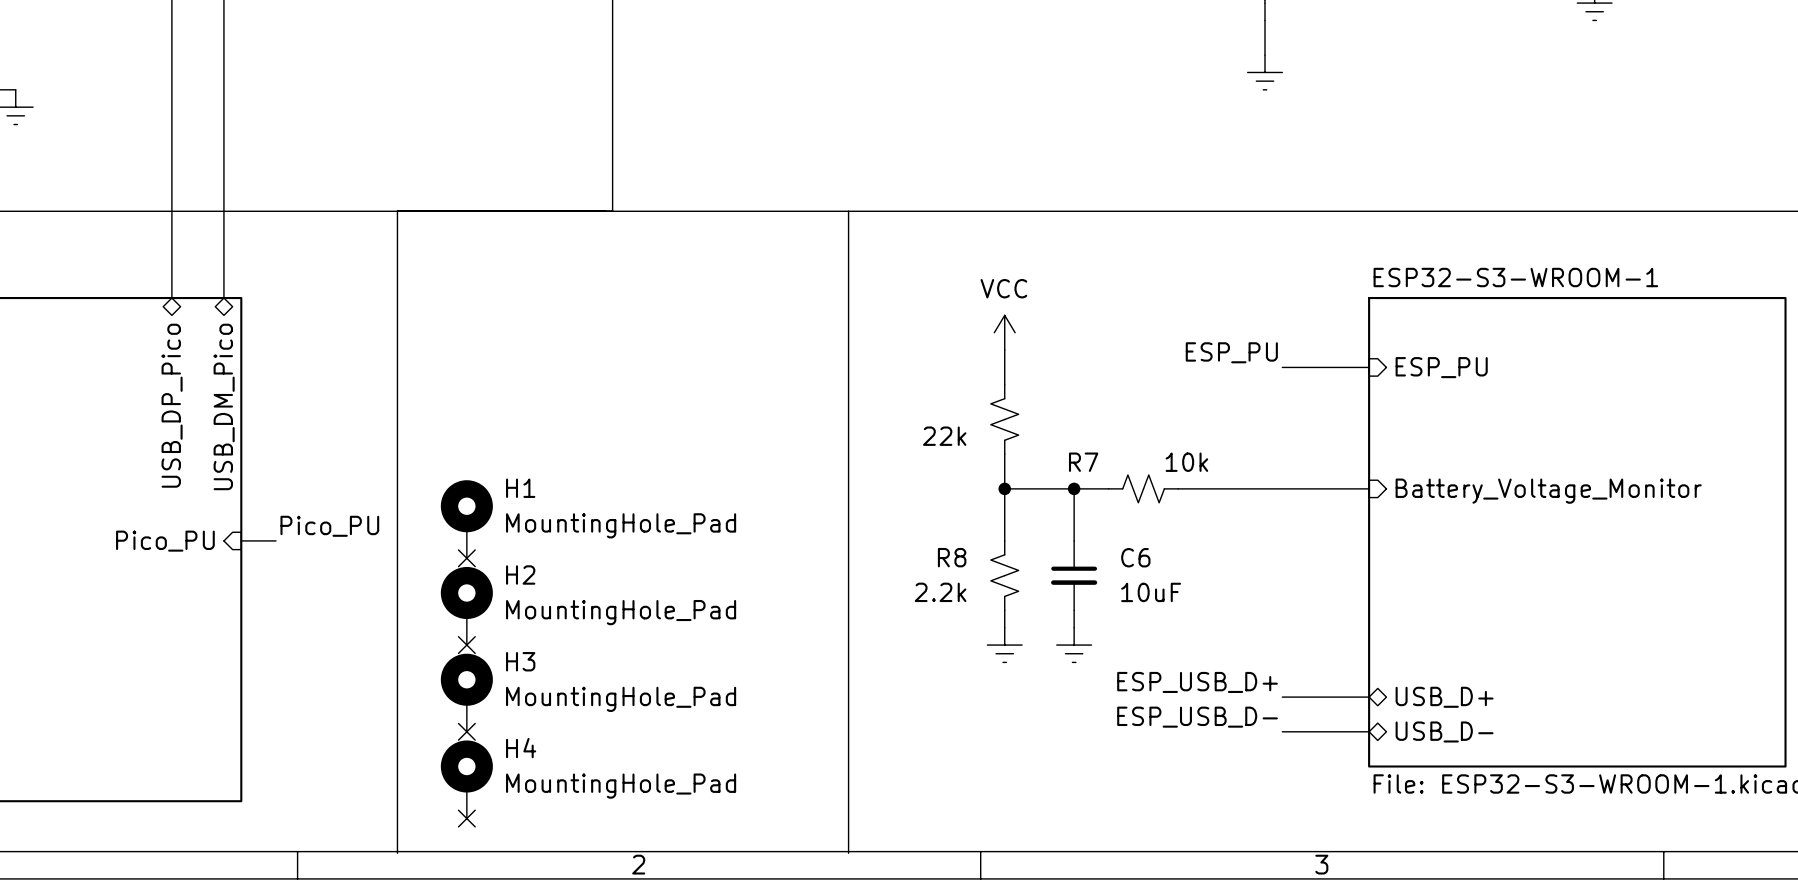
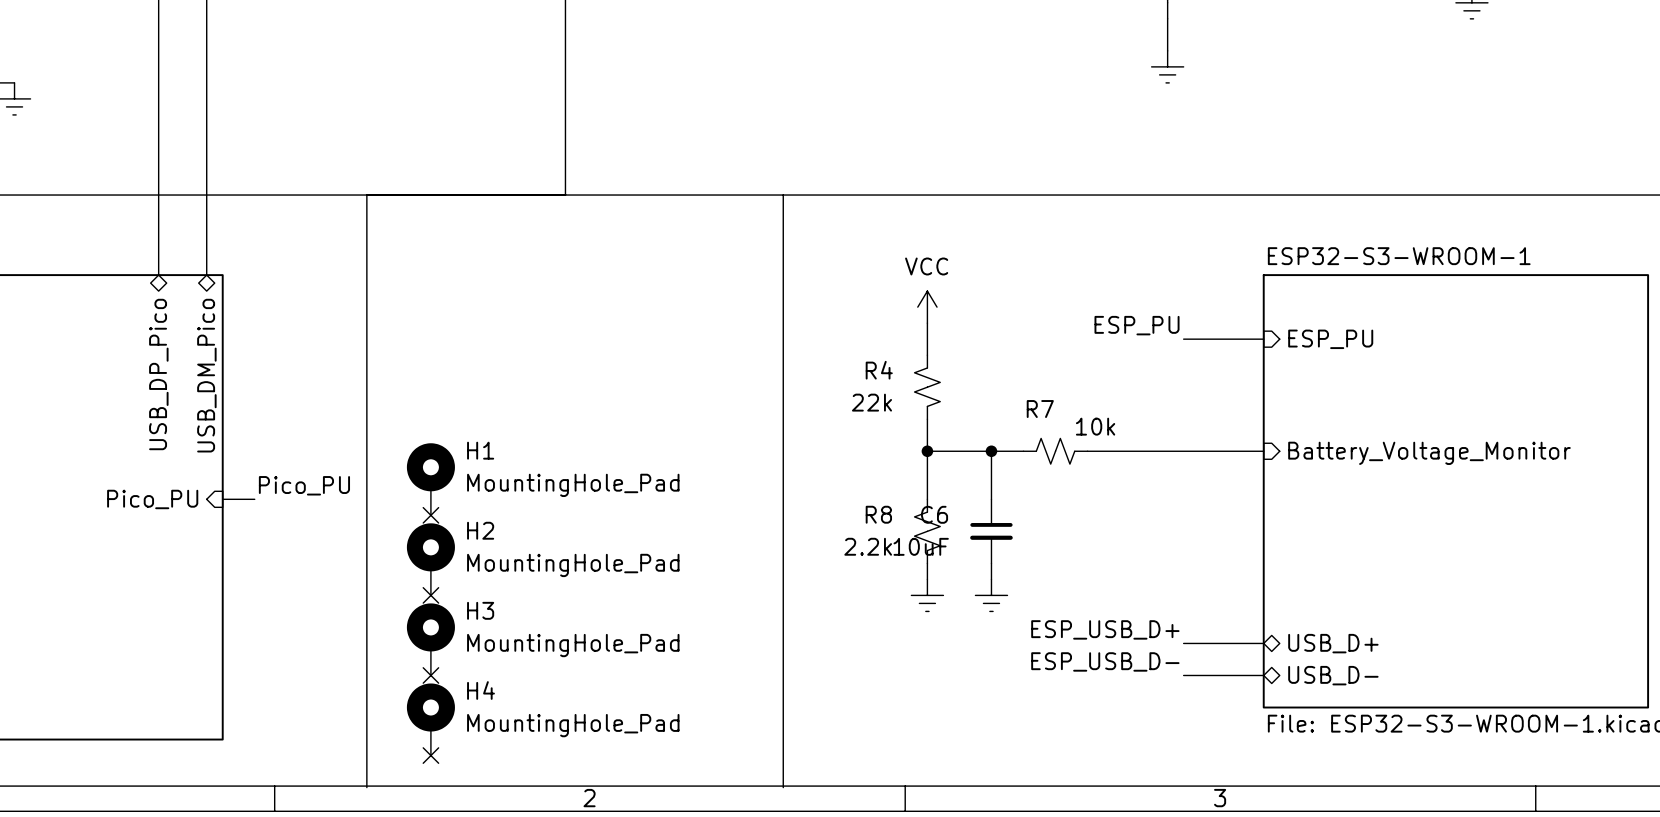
R4 name: none -> R4 (879, 370)
R7 name position: R7 (1083, 462) -> R7 (1040, 409)
C6 name position: C6 (1135, 557) -> C6 (934, 514)
C6 value position: 10uF (1151, 592) -> 10uF (921, 546)

